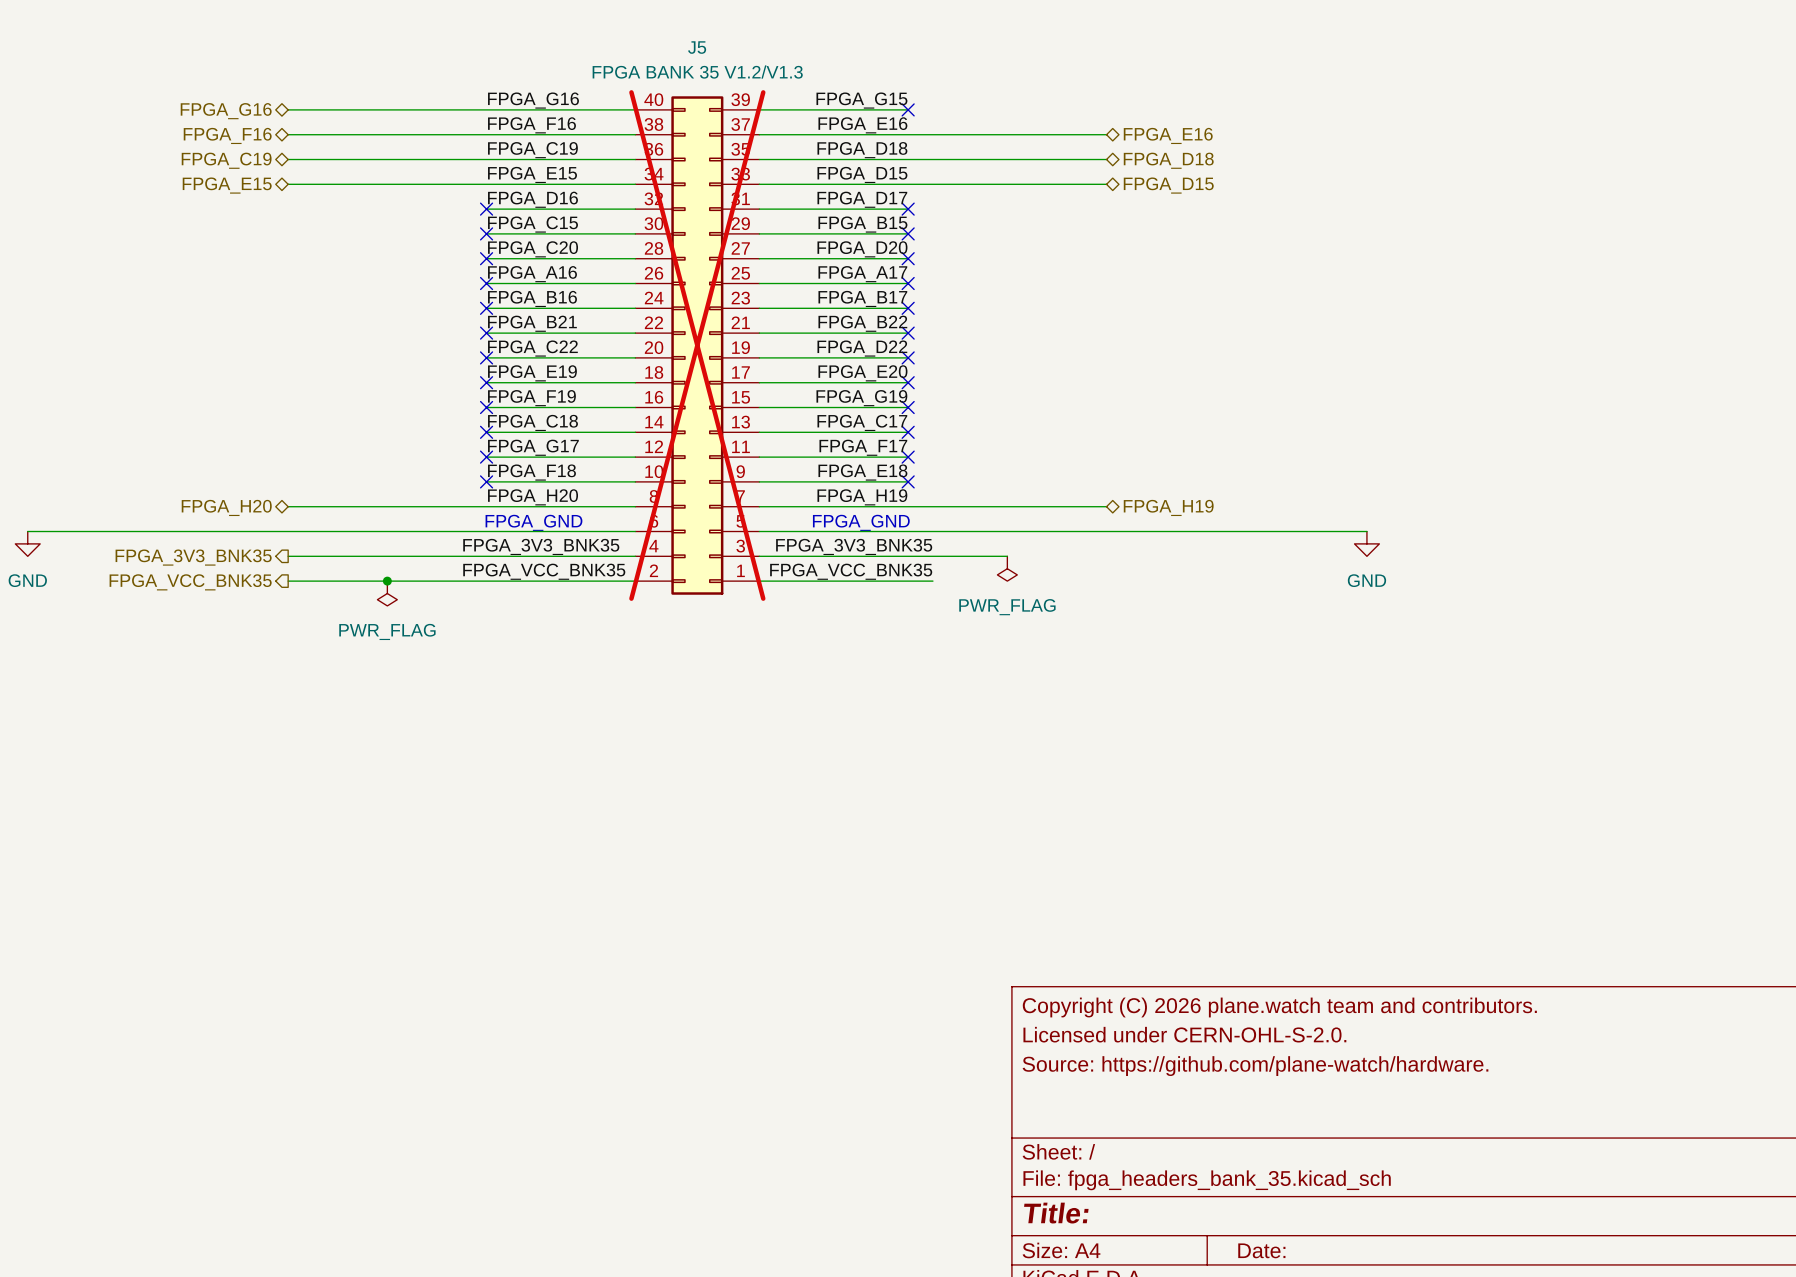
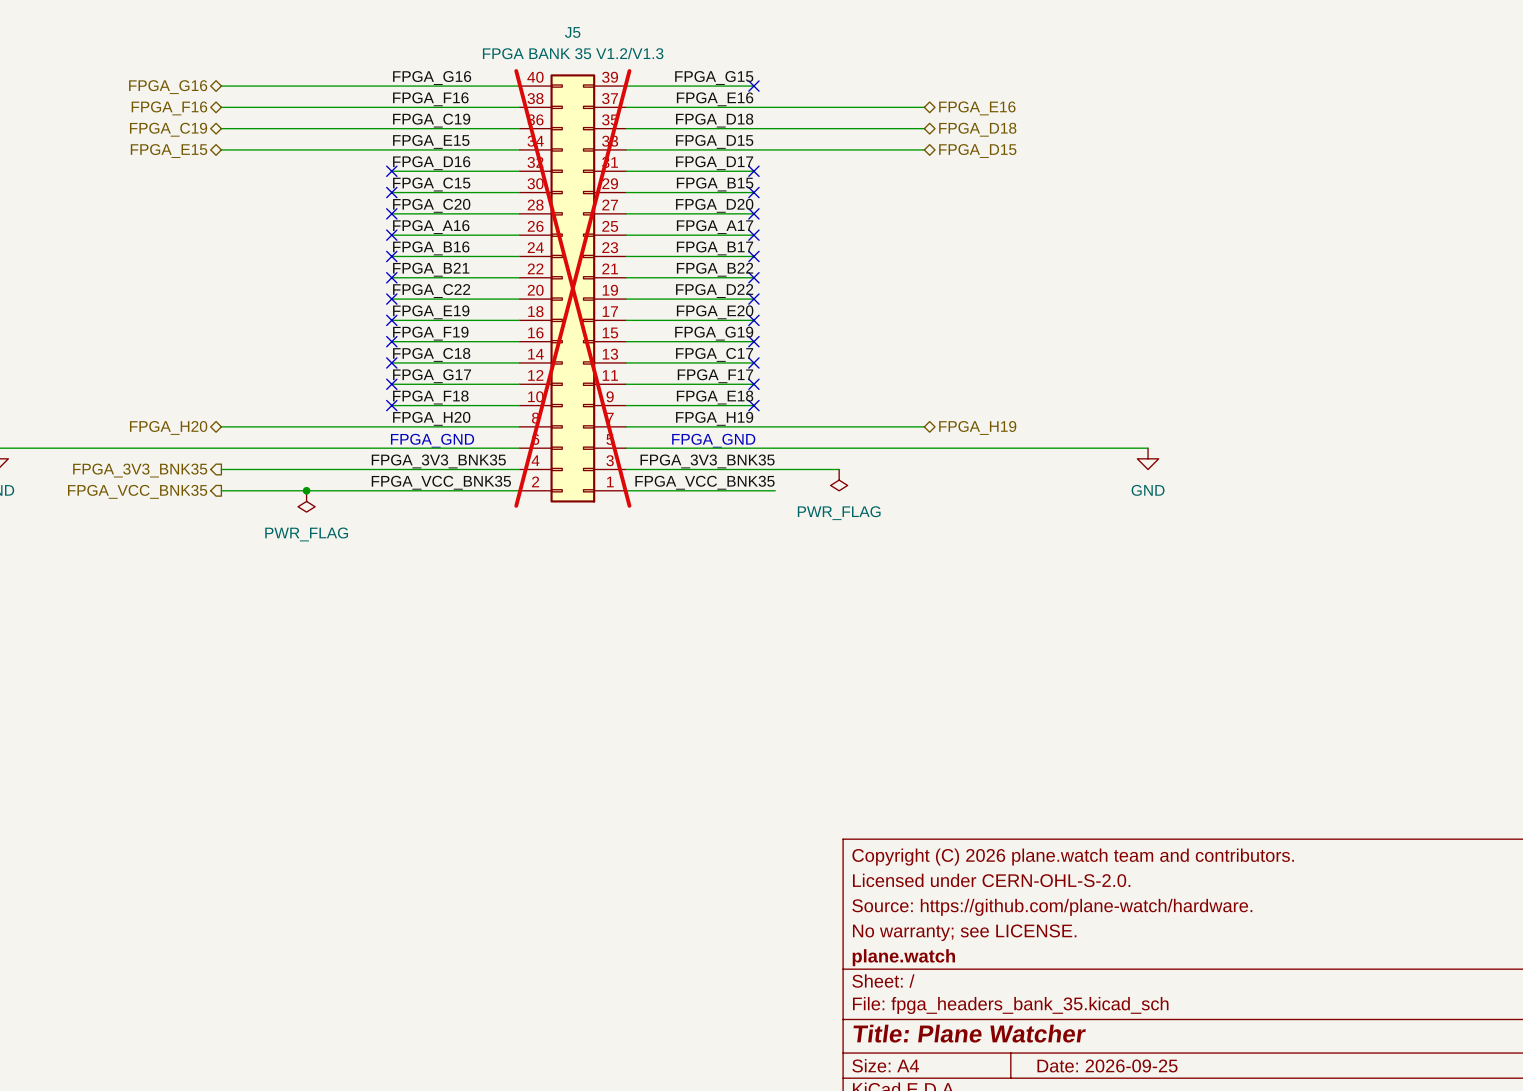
title block: none -> No warranty; see LICENSE. (964, 932)
title block: none -> plane.watch (903, 957)
title block: Title: (1056, 1213) -> Title: Plane Watcher (969, 1033)
title block: Date: (1261, 1250) -> Date: 2026-09-25 (1107, 1065)

